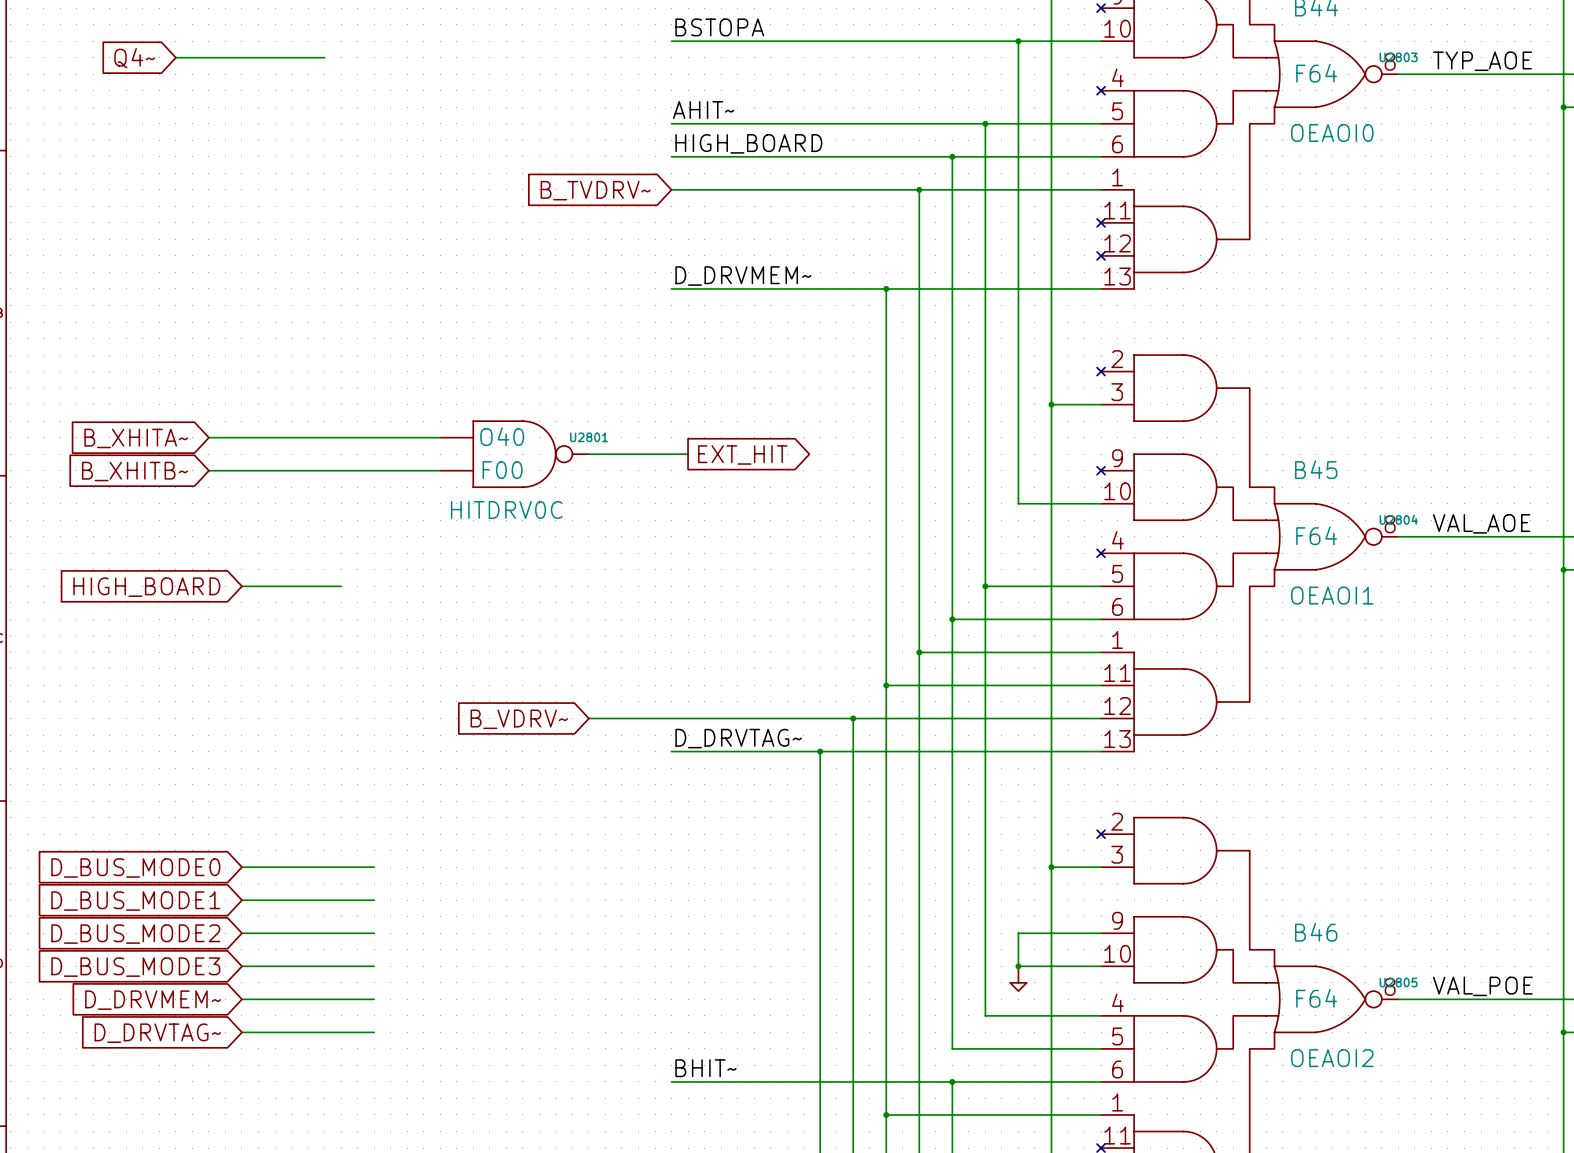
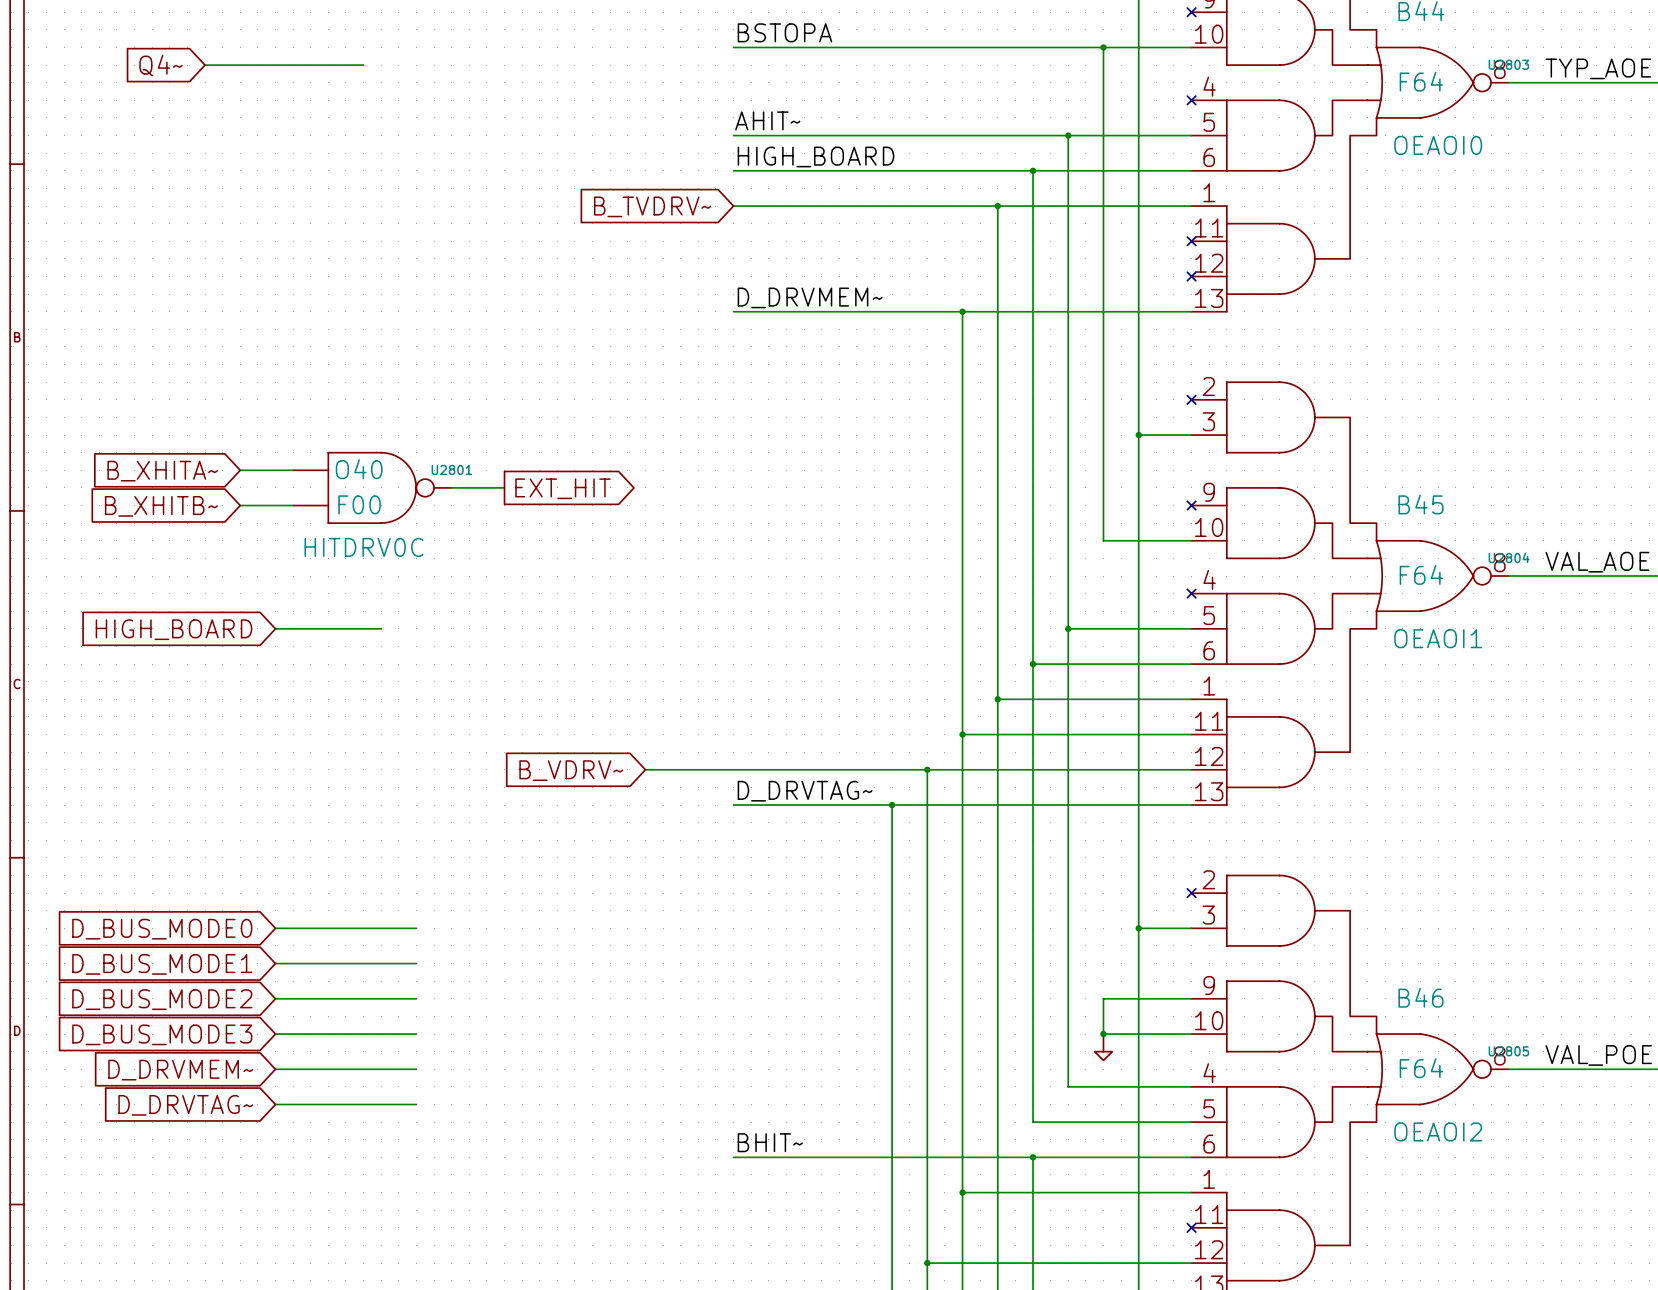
wire: (258, 437) (440, 437) -> none
wire: none -> (451, 487) (504, 487)
global label: none -> EXT_HIT (562, 488)
U2801 position: (514, 454) -> (372, 487)
wire: (588, 454) (688, 454) -> none
global label: EXT_HIT (742, 454) -> none
wire: (258, 470) (440, 470) -> none

